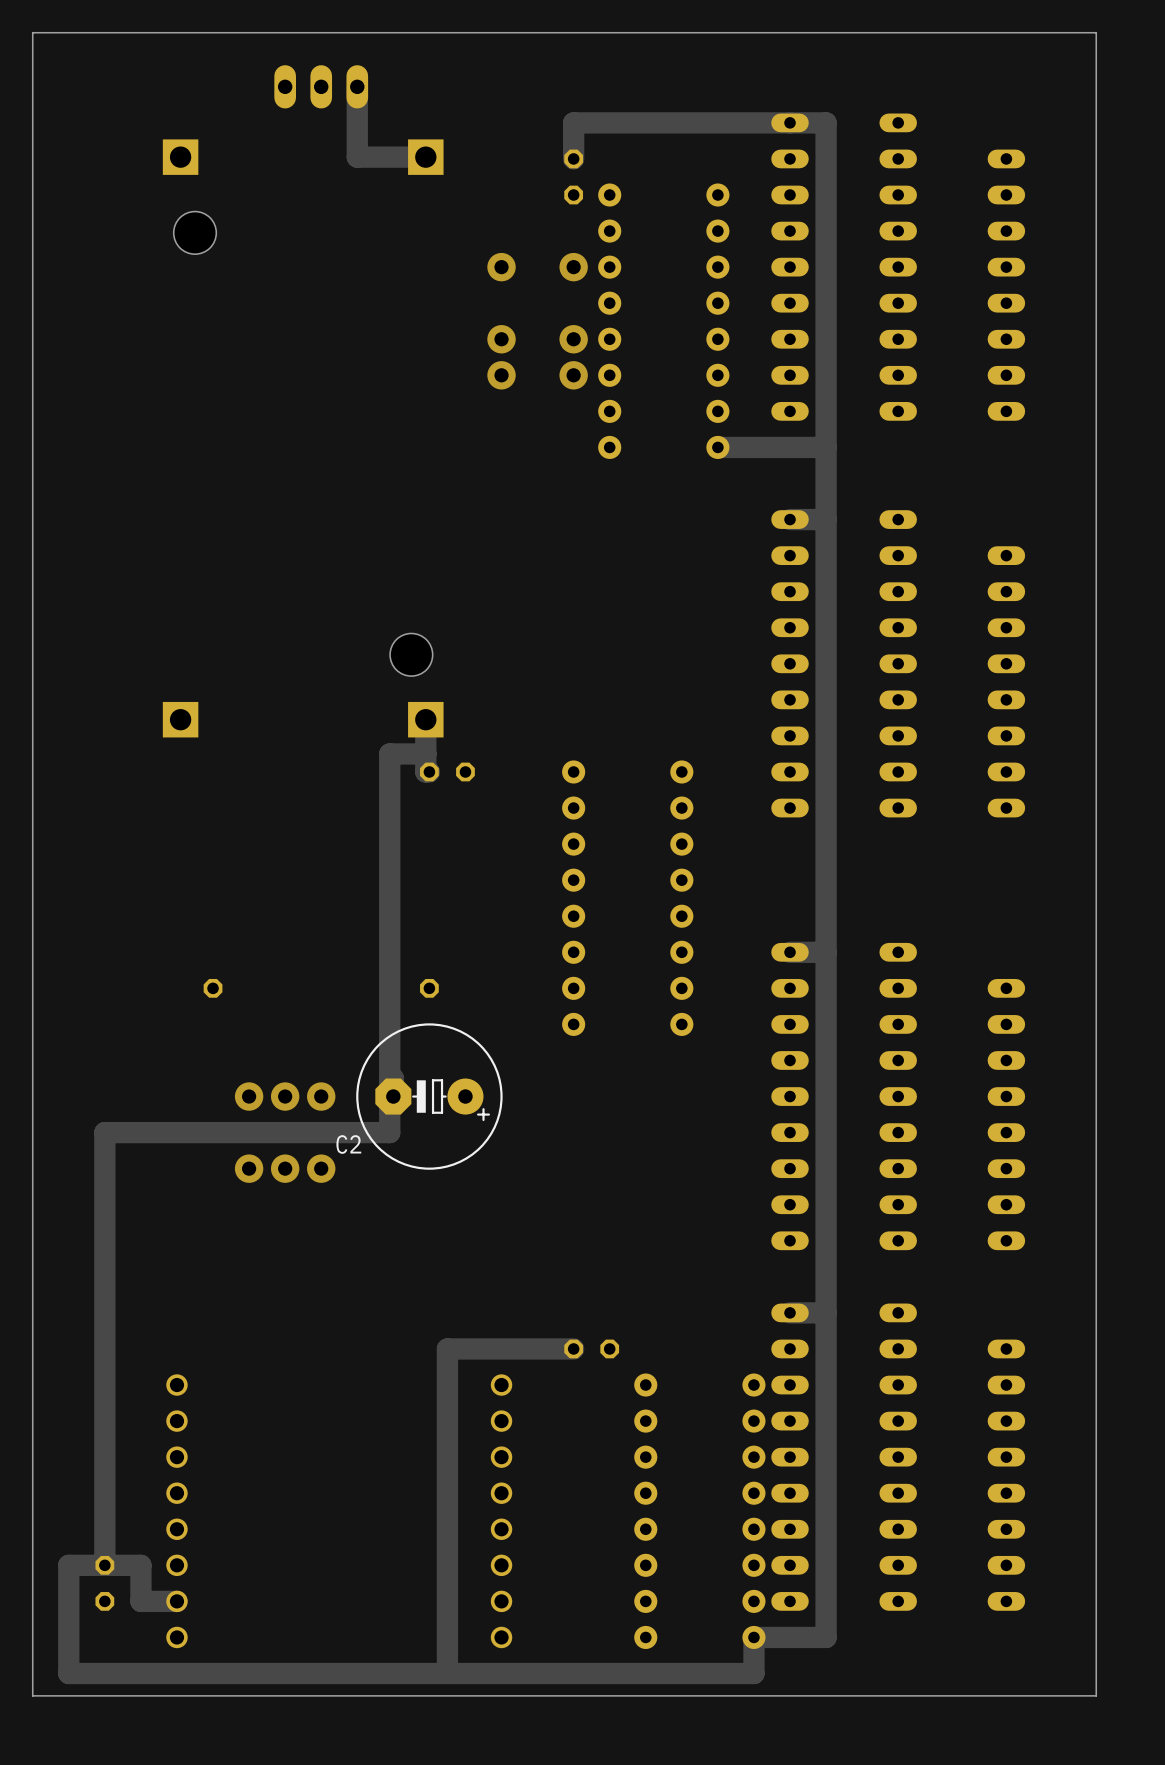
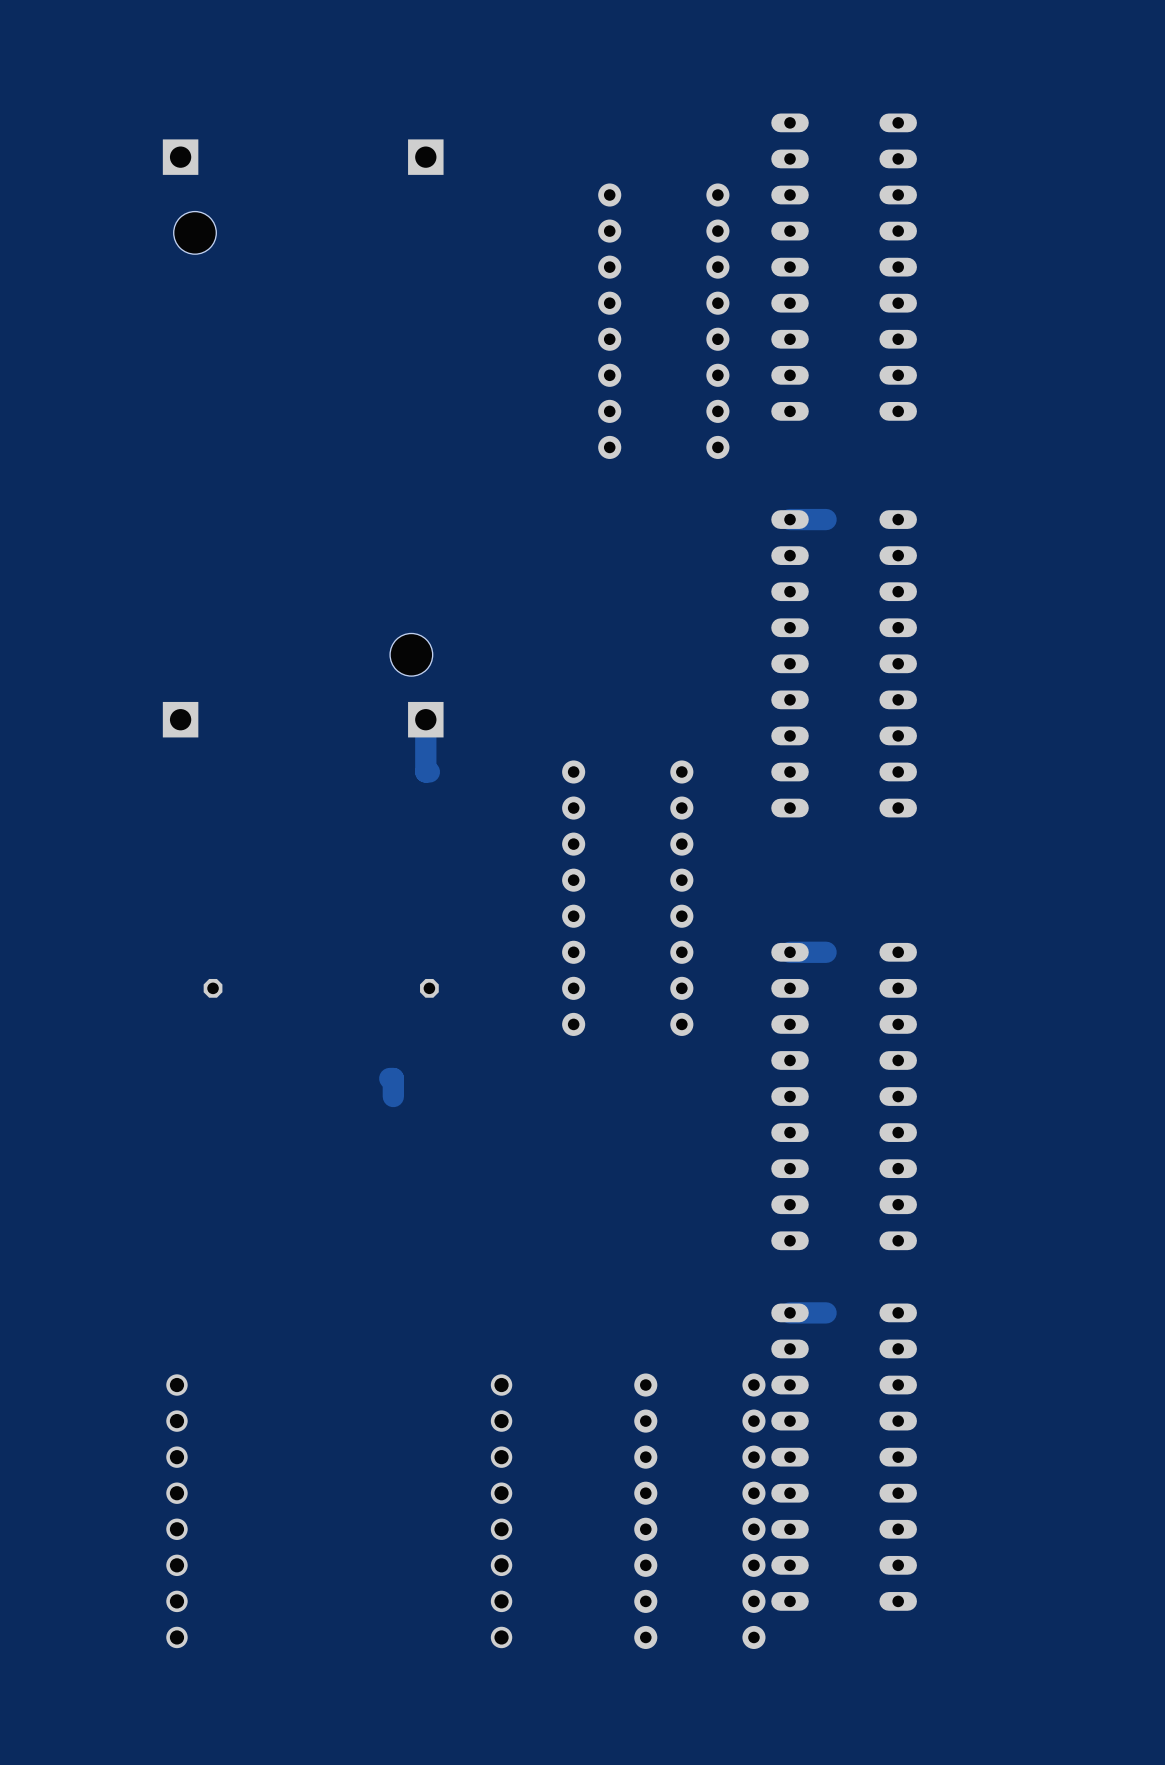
board edge: (1096, 32) (32, 32) (32, 1695) (1096, 1695) (1096, 32) -> none
part: (321, 86) -> none
track: (357, 86) (357, 157) (425, 157) -> none
track: (573, 158) (573, 122) (826, 122) (826, 1637) (753, 1637) (753, 1673) (68, 1673) (68, 1565) (140, 1565) (140, 1601) (176, 1601) -> none
part: (573, 176) -> none
via: (501, 267) -> none
via: (573, 267) -> none
part: (1006, 285) -> none
via: (501, 339) -> none
via: (573, 339) -> none
via: (501, 375) -> none
via: (573, 375) -> none
track: (826, 447) (717, 447) -> none
part: (1006, 681) -> none
track: (425, 753) (389, 753) (389, 1132) (104, 1132) (104, 1565) -> none
part: (447, 771) -> none
via: (249, 1096) -> none
via: (285, 1096) -> none
via: (321, 1096) -> none
C2: (429, 1096) -> none
part: (1006, 1114) -> none
via: (249, 1168) -> none
via: (285, 1168) -> none
via: (321, 1168) -> none
track: (573, 1348) (447, 1348) (447, 1670) -> none
part: (591, 1348) -> none
part: (1006, 1475) -> none
part: (104, 1583) -> none

